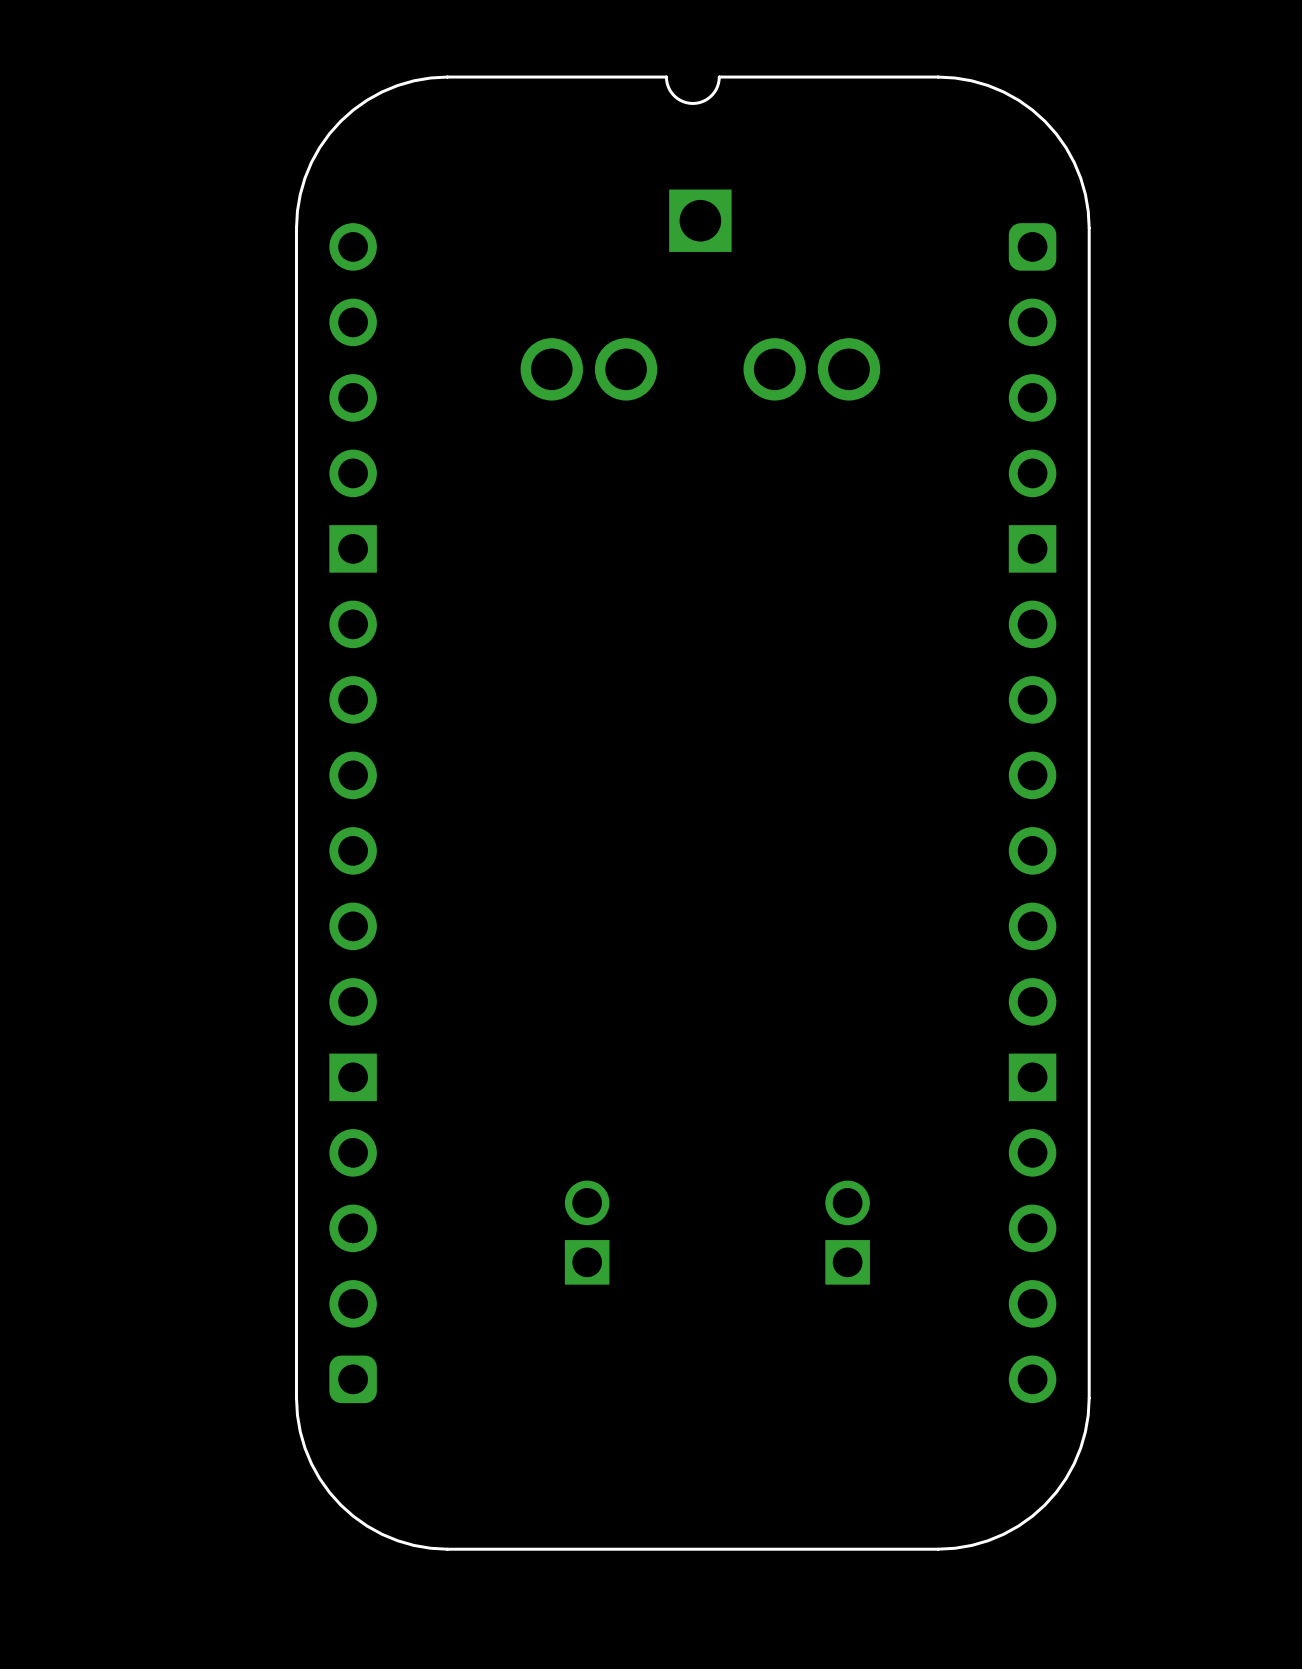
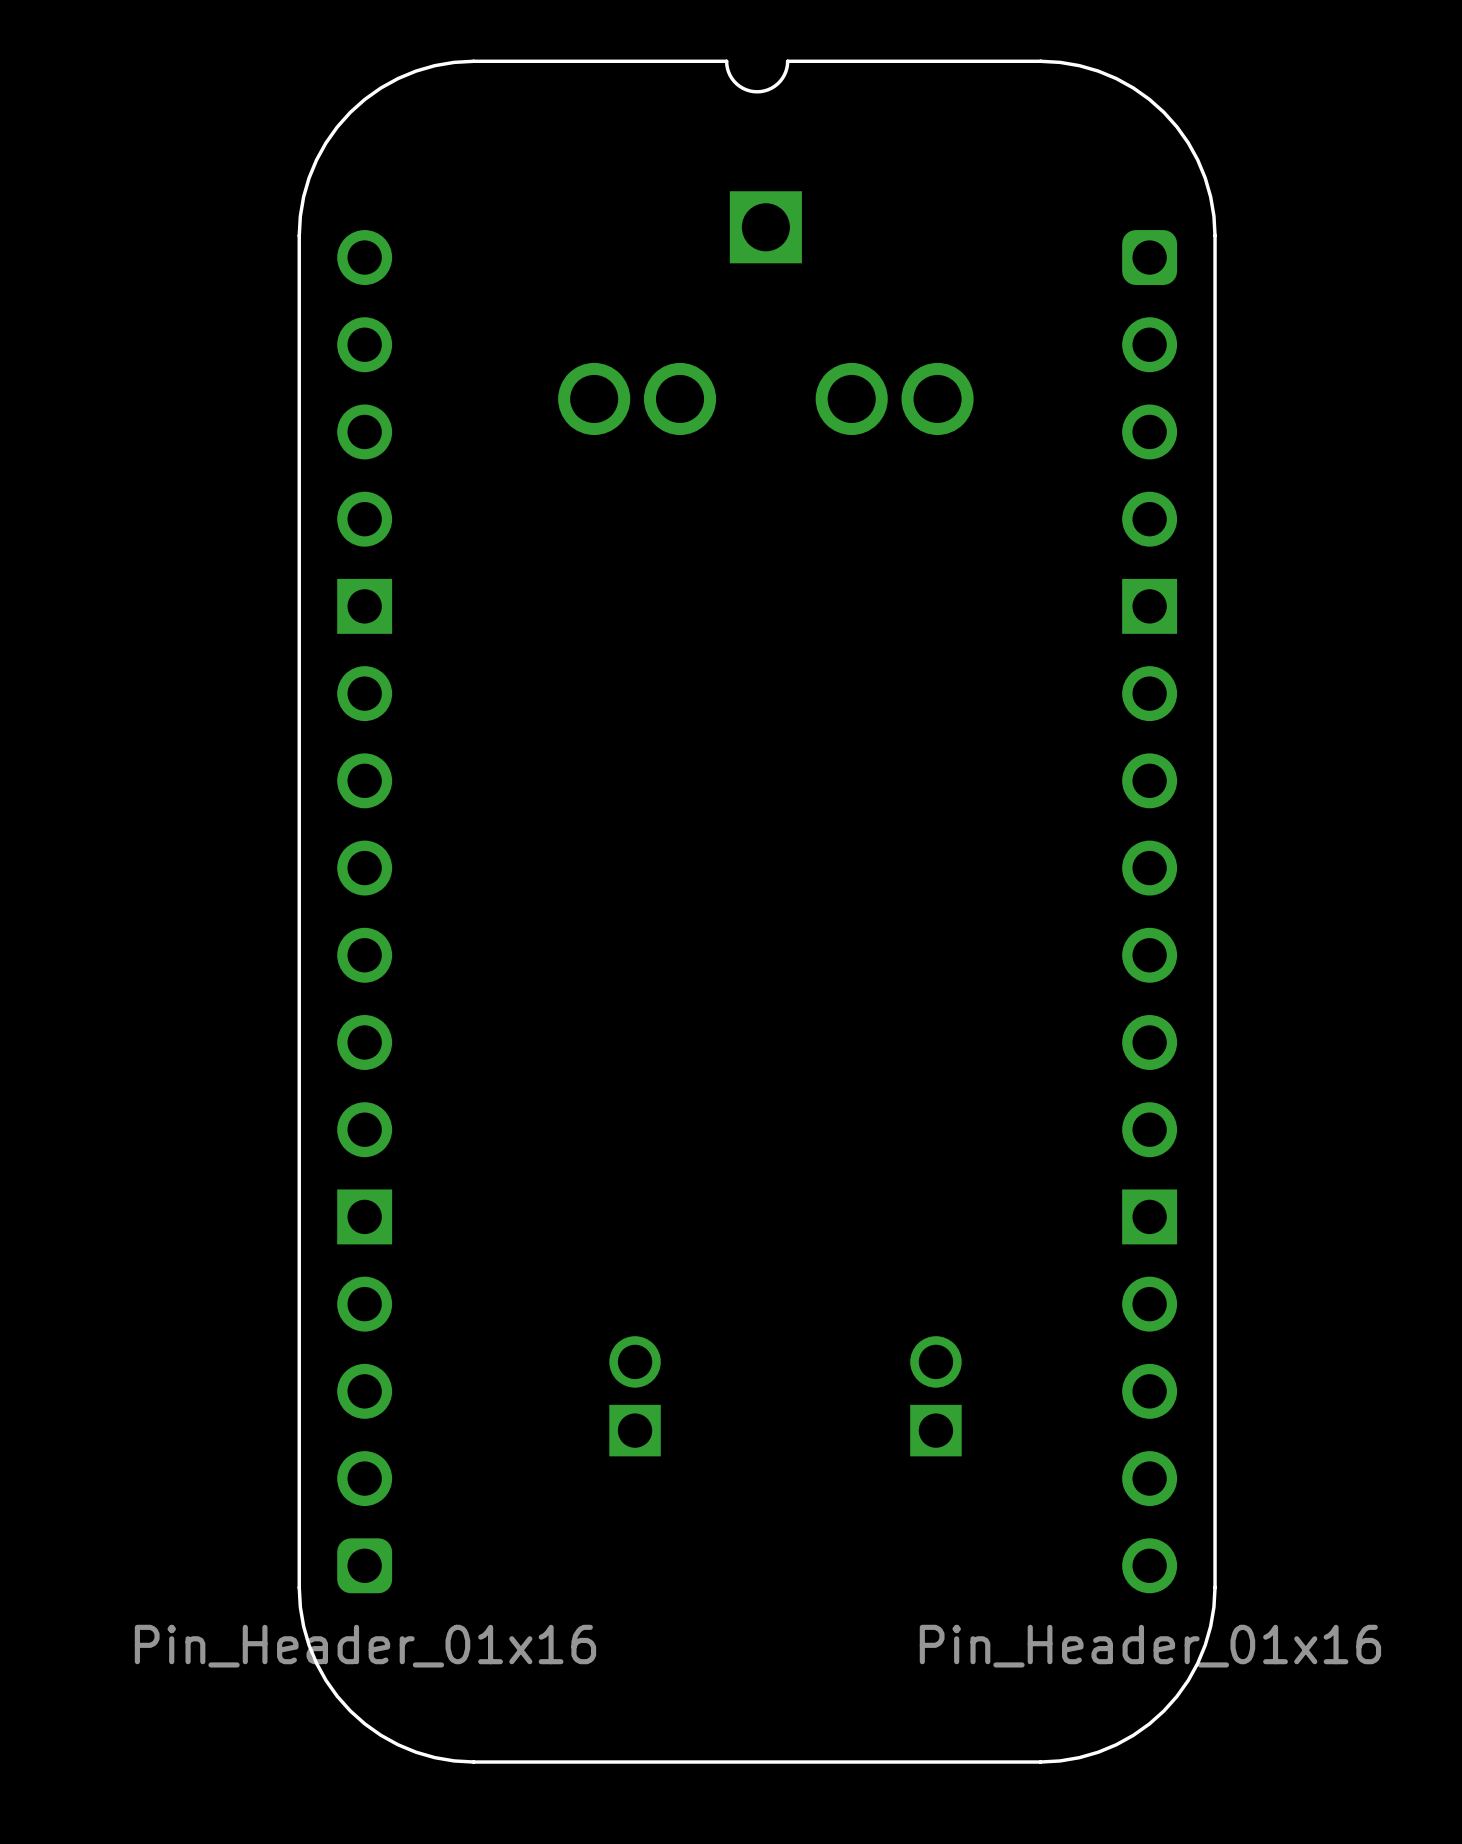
drawing: none -> [134, 1624, 597, 1668]
drawing: none -> [919, 1624, 1382, 1668]

